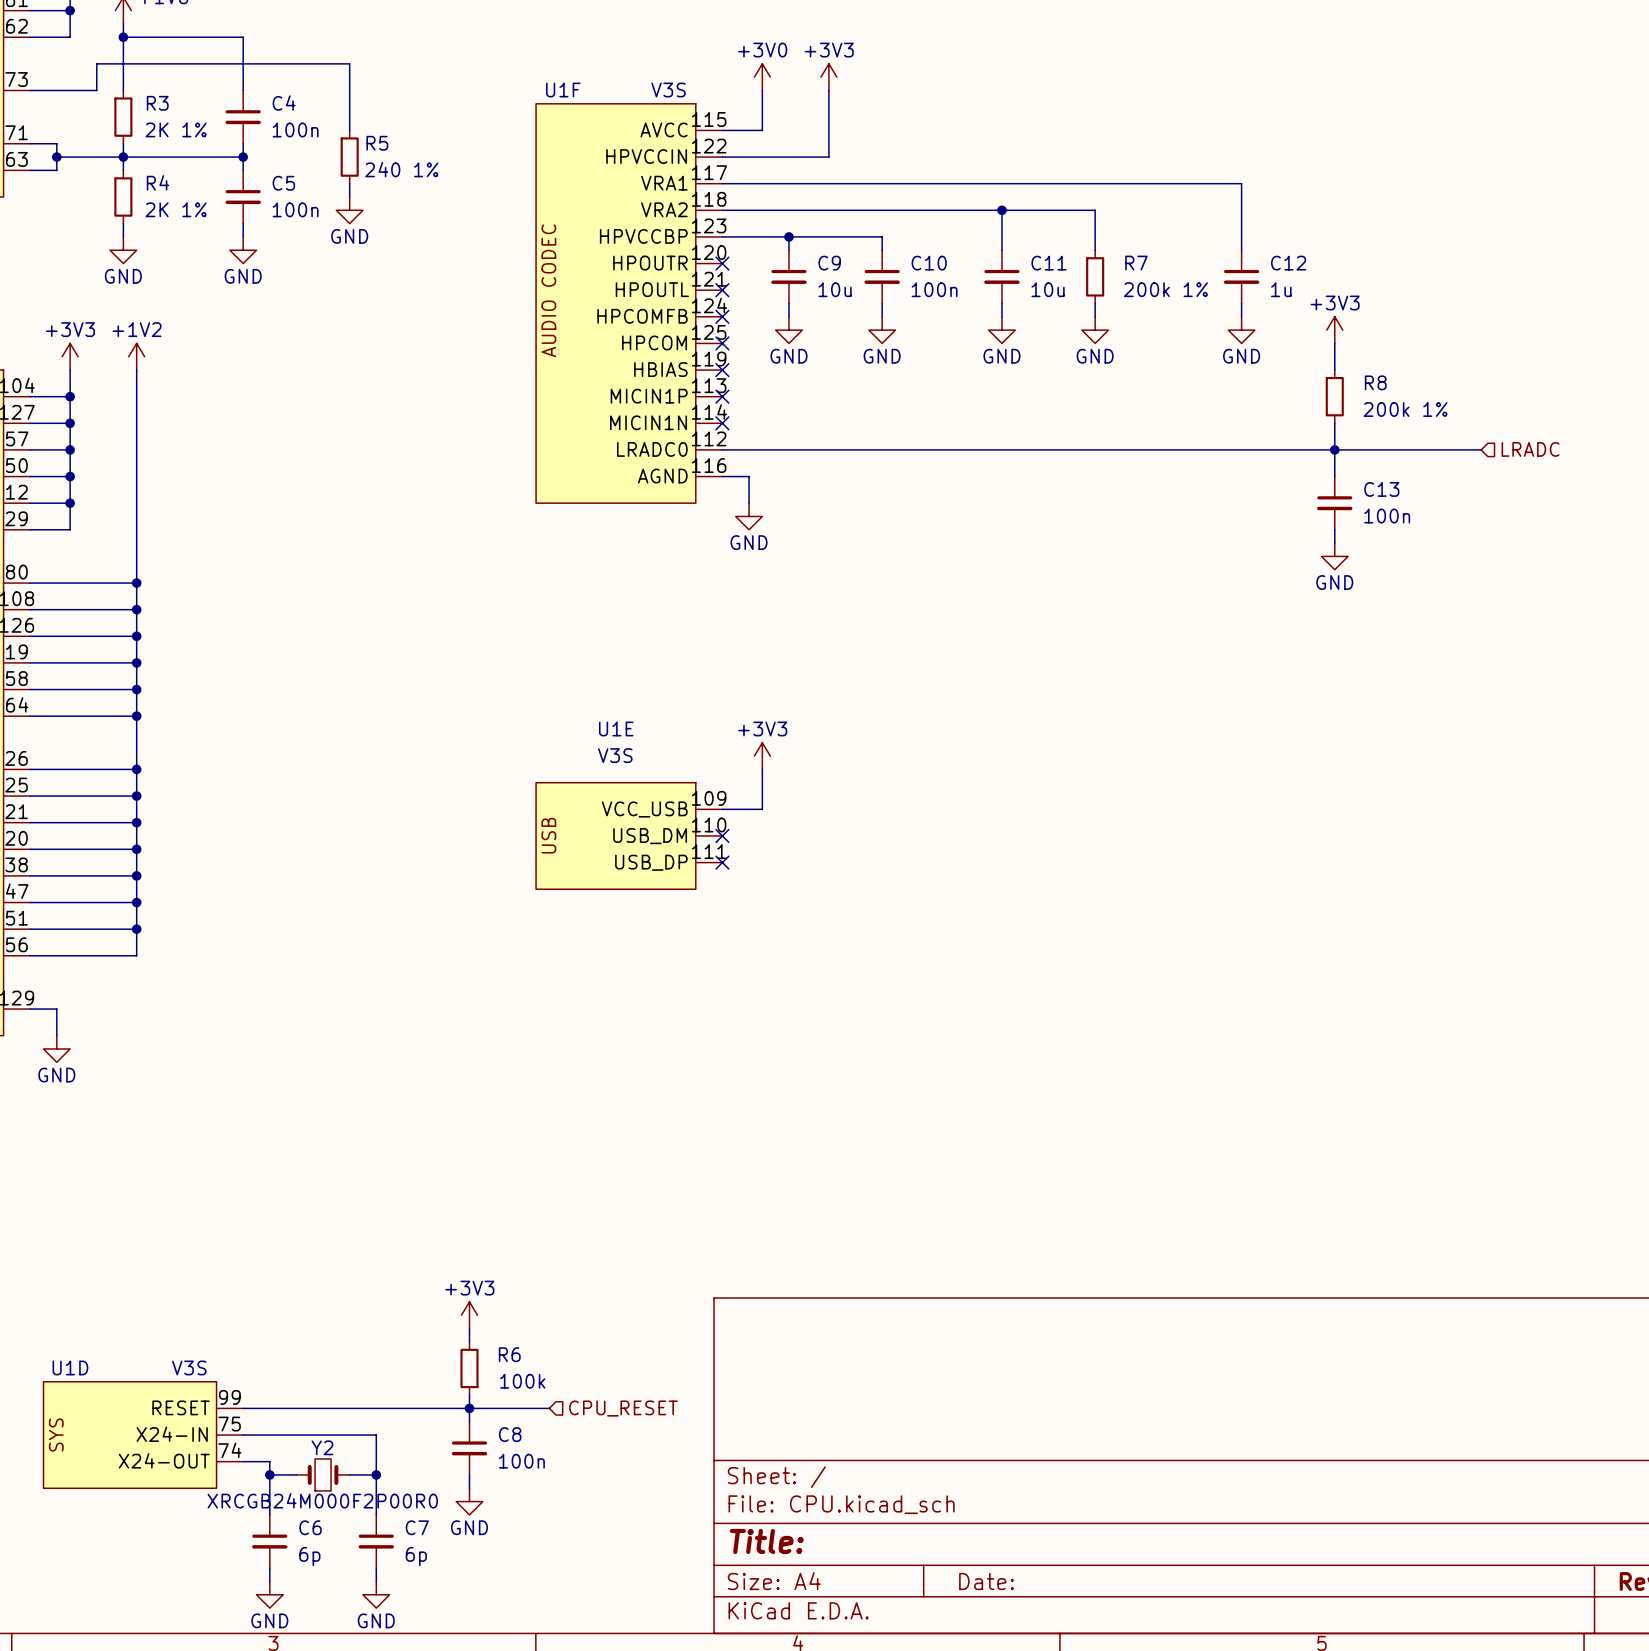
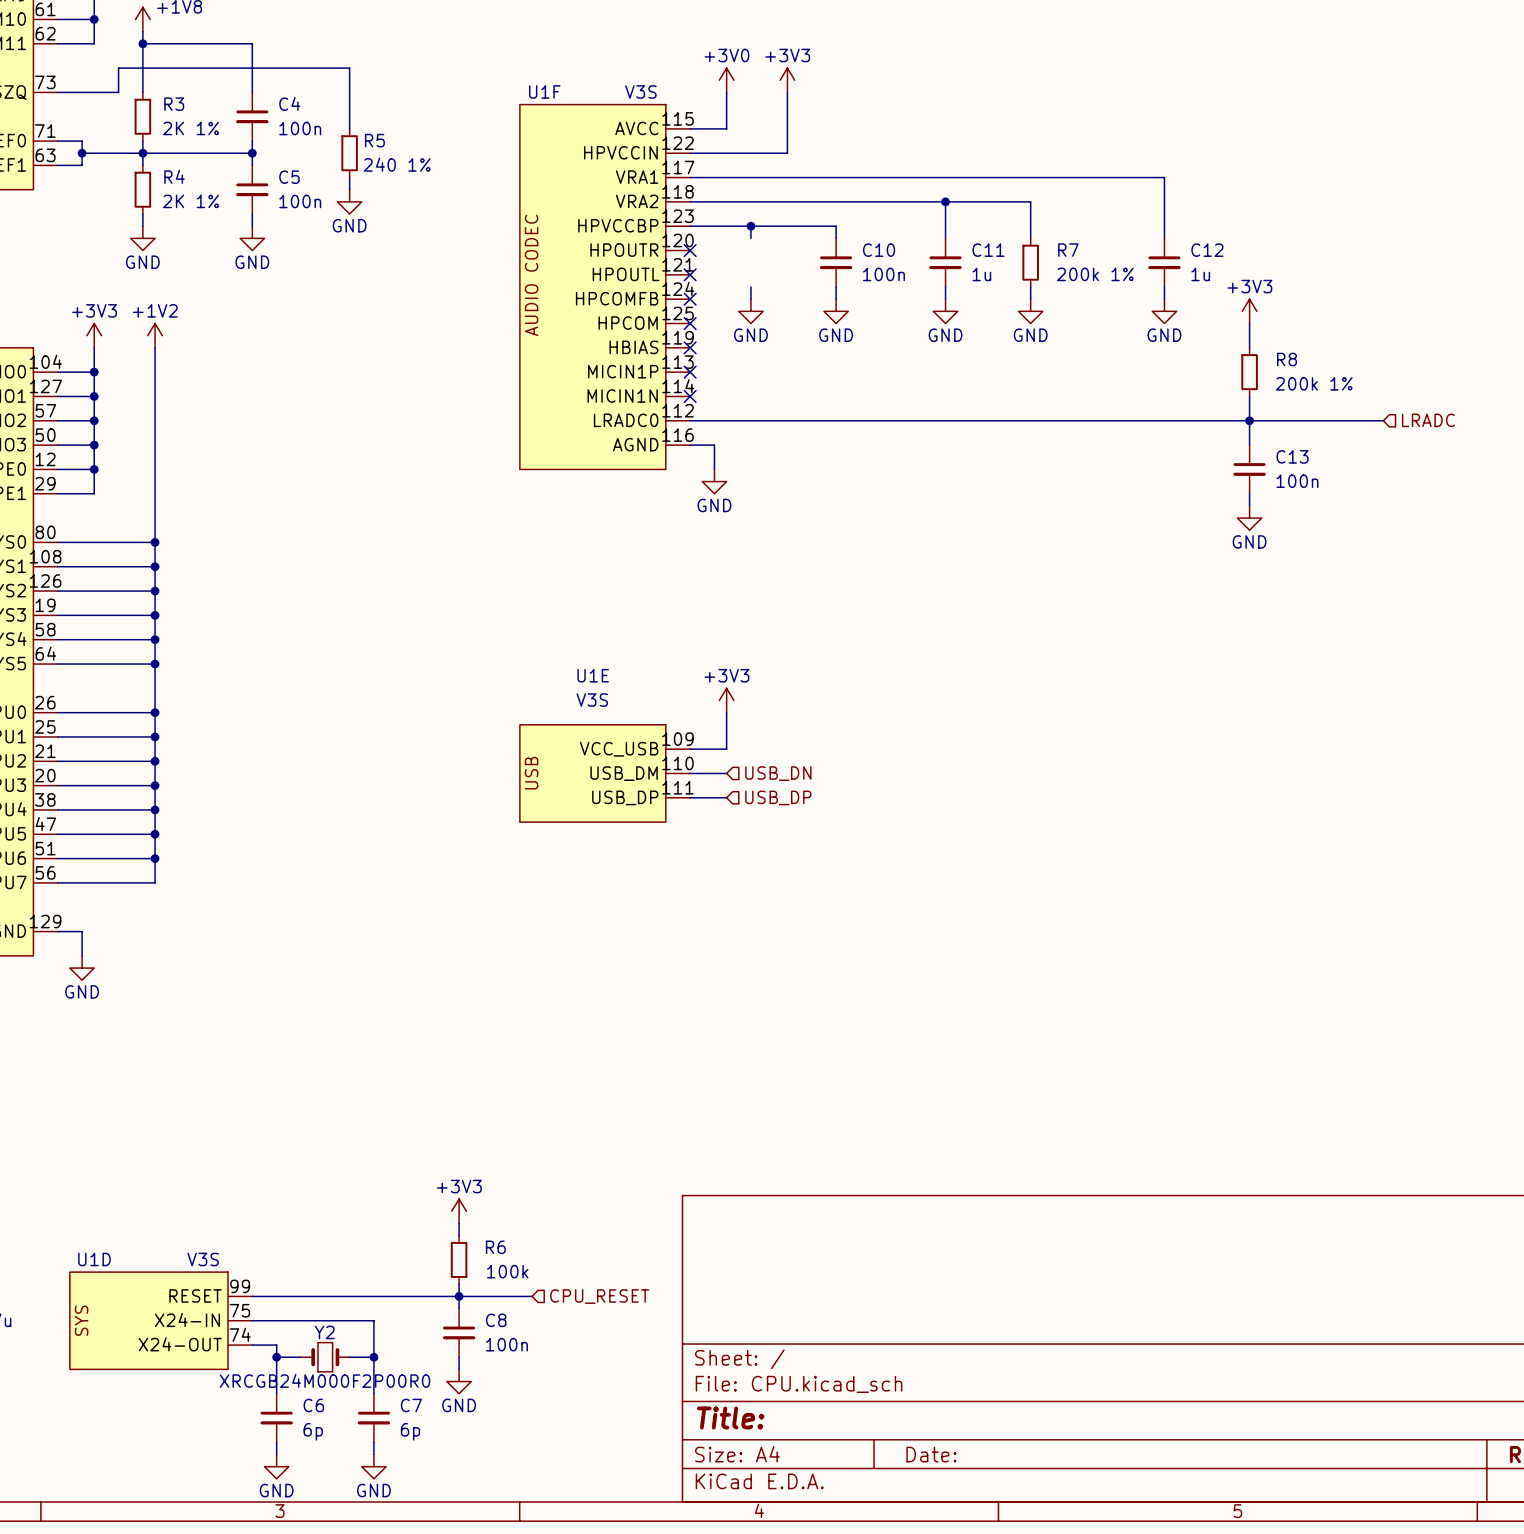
C9: 10u (788, 276) -> none
C11 value: 10u (1048, 289) -> 1u (981, 274)
wire: none -> (690, 773) (726, 773)
no-connect mark: (722, 835) -> none
hierarchical label: none -> USB_DN (778, 773)
wire: none -> (690, 797) (726, 797)
no-connect mark: (722, 862) -> none
hierarchical label: none -> USB_DP (778, 797)

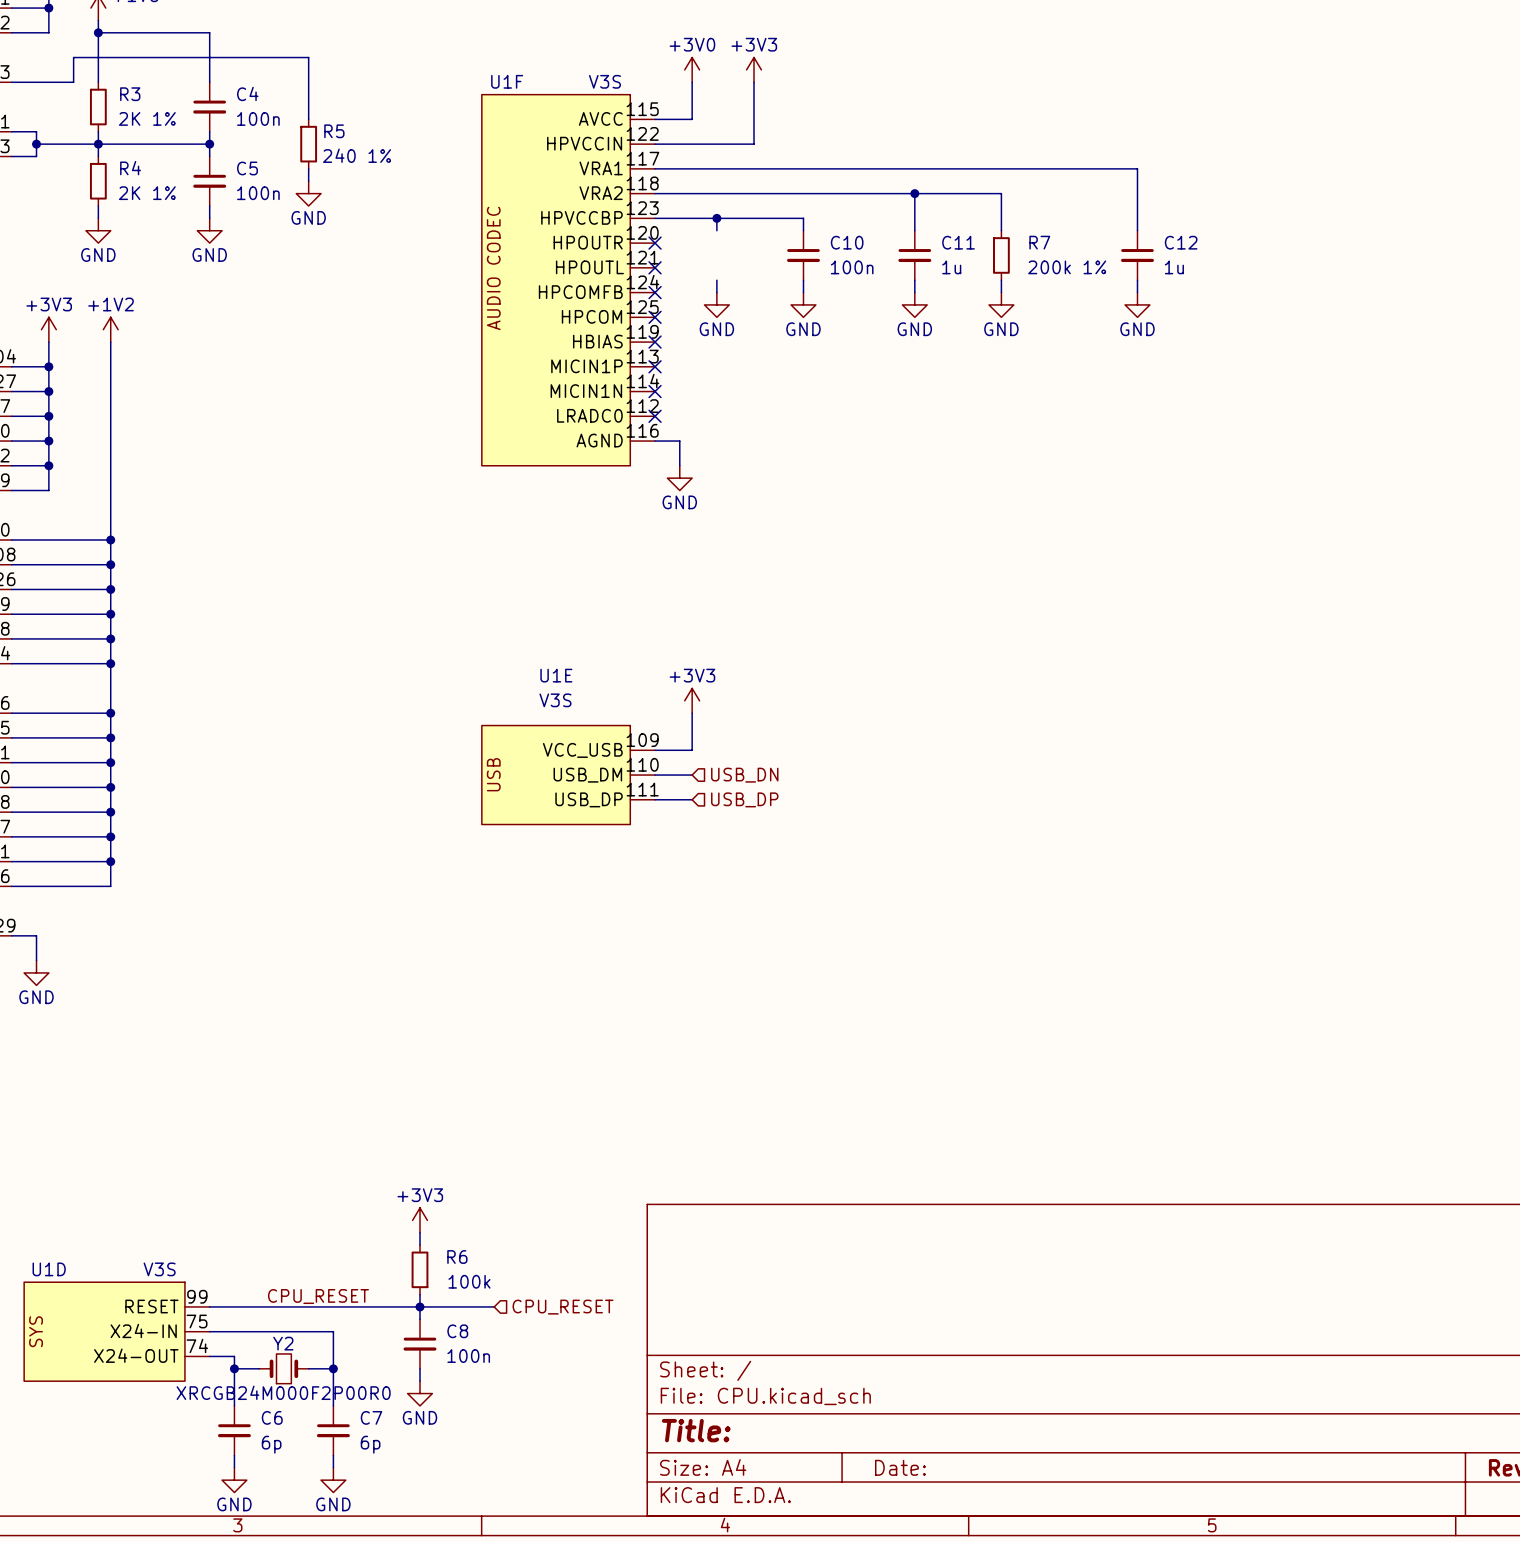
power symbol: +3V3 (1249, 311) -> none
wire: (1249, 323) (1249, 347) -> none
R8: 200k 1% (1249, 372) -> none
wire: (1249, 396) (1249, 445) -> none
wire: (690, 420) (1383, 420) -> none
no-connect mark: none -> (655, 416)
junction: (1249, 420) -> none
hierarchical label: LRADC (1428, 420) -> none
C13: 100n (1249, 469) -> none
wire: (1249, 493) (1249, 505) -> none
power symbol: GND (1249, 518) -> none
label: none -> CPU_RESET (318, 1296)

